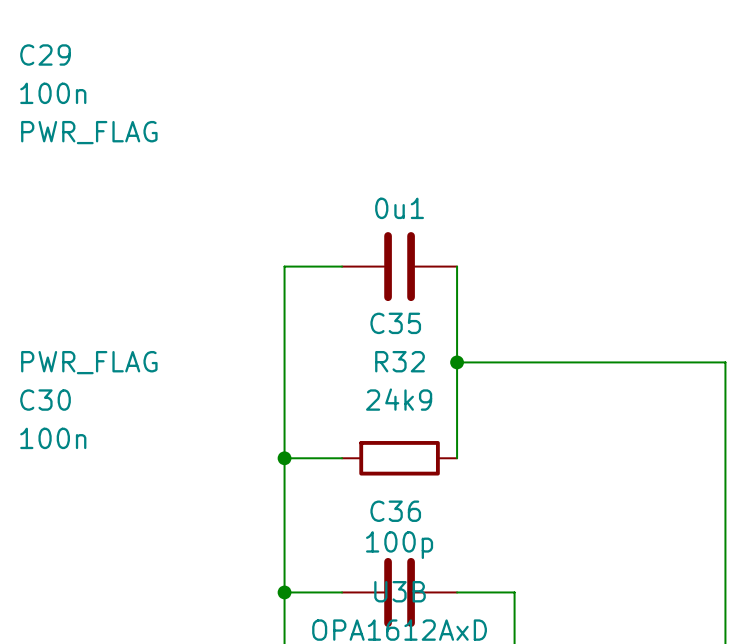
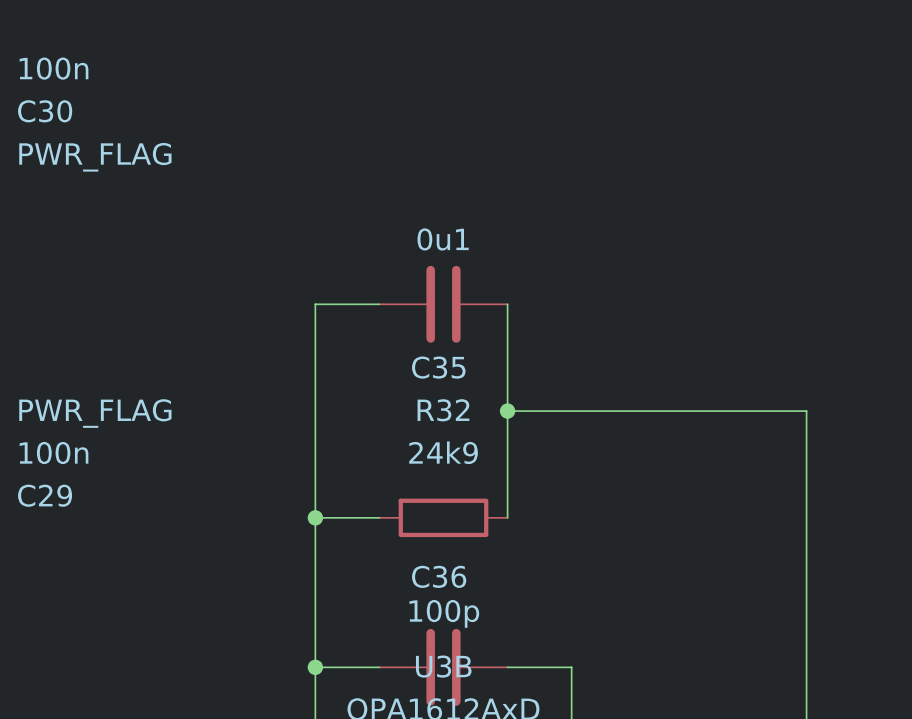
C29 name: C29 (45, 55) -> C30 (45, 111)
C29 value position: 100n (53, 93) -> 100n (53, 68)
C30 name: C30 (45, 400) -> C29 (45, 495)
C30 value position: 100n (53, 438) -> 100n (53, 453)

